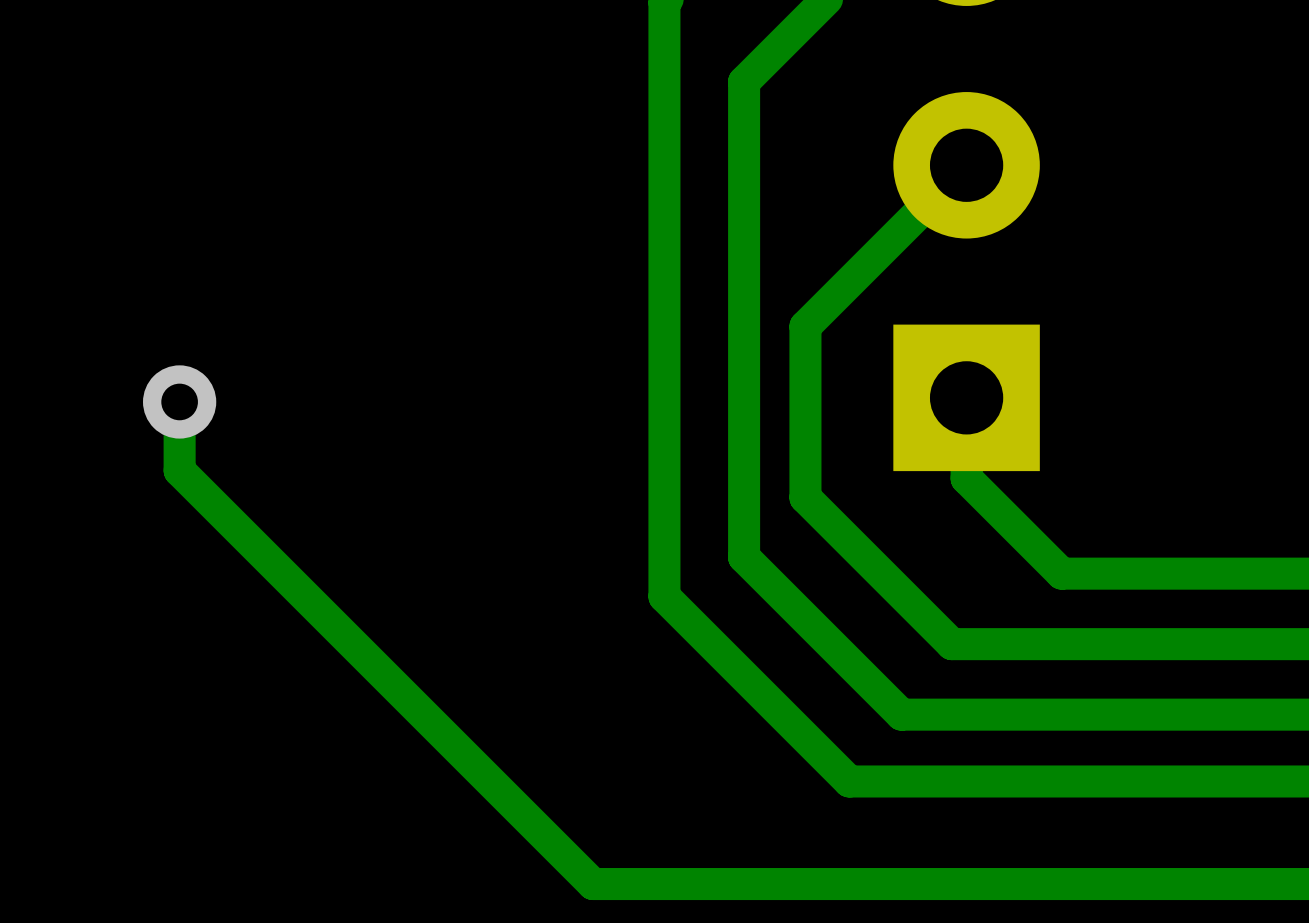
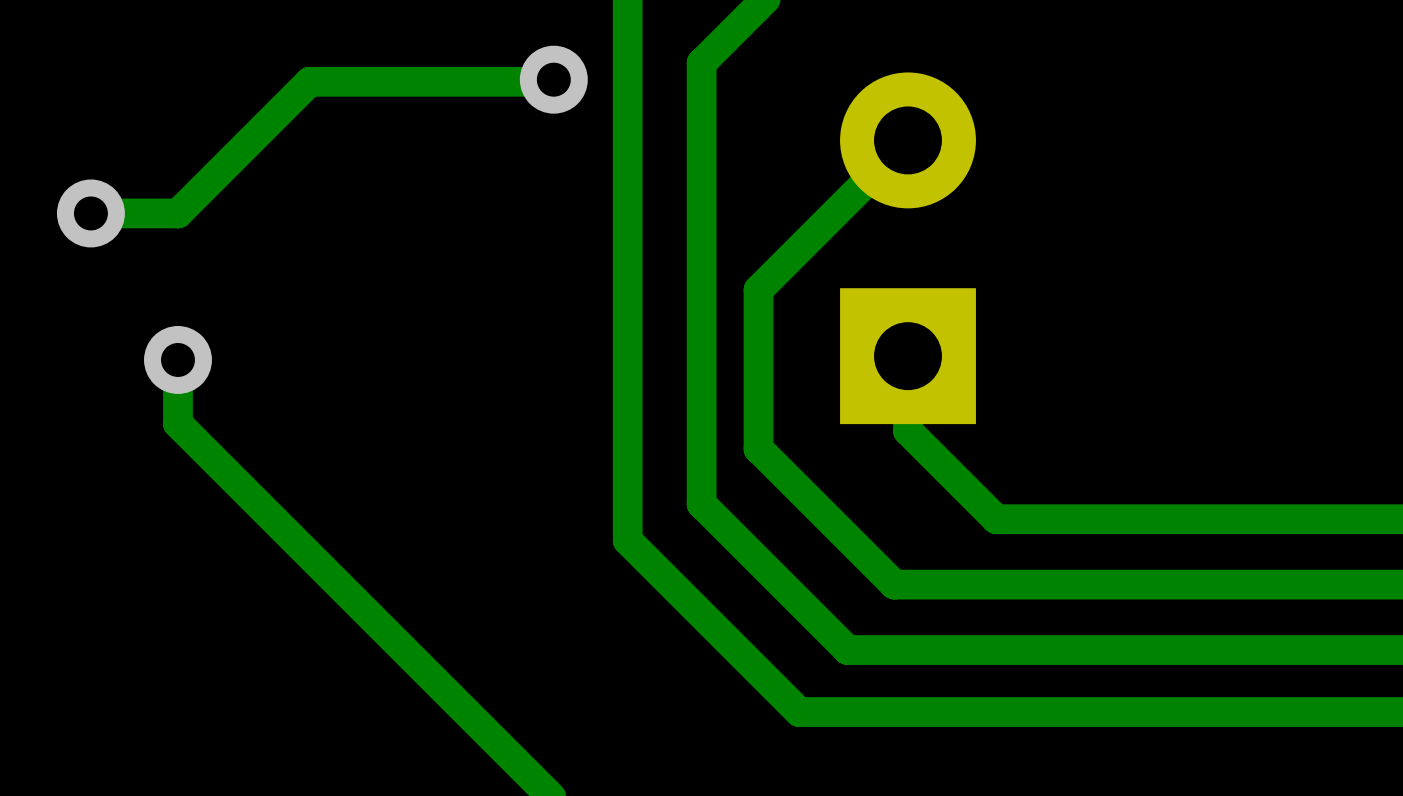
track: none -> (553, 79) (551, 81) (309, 81) (177, 213) (90, 213)
via: none -> (553, 79)
via: none -> (90, 213)

